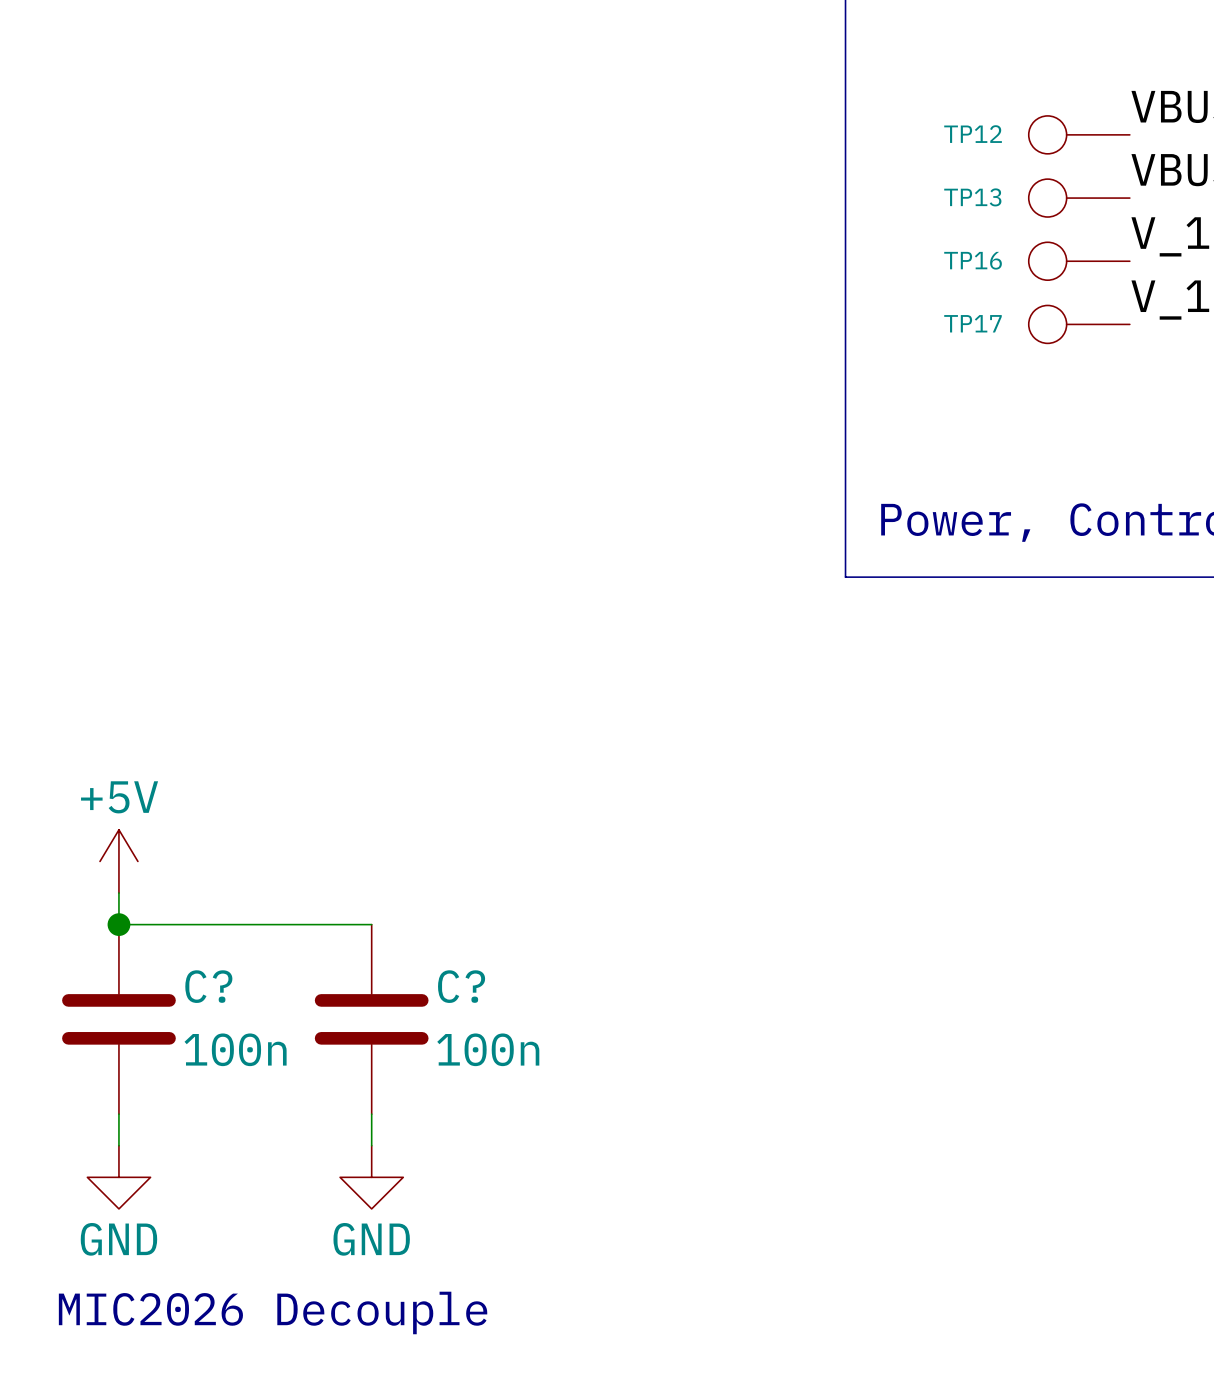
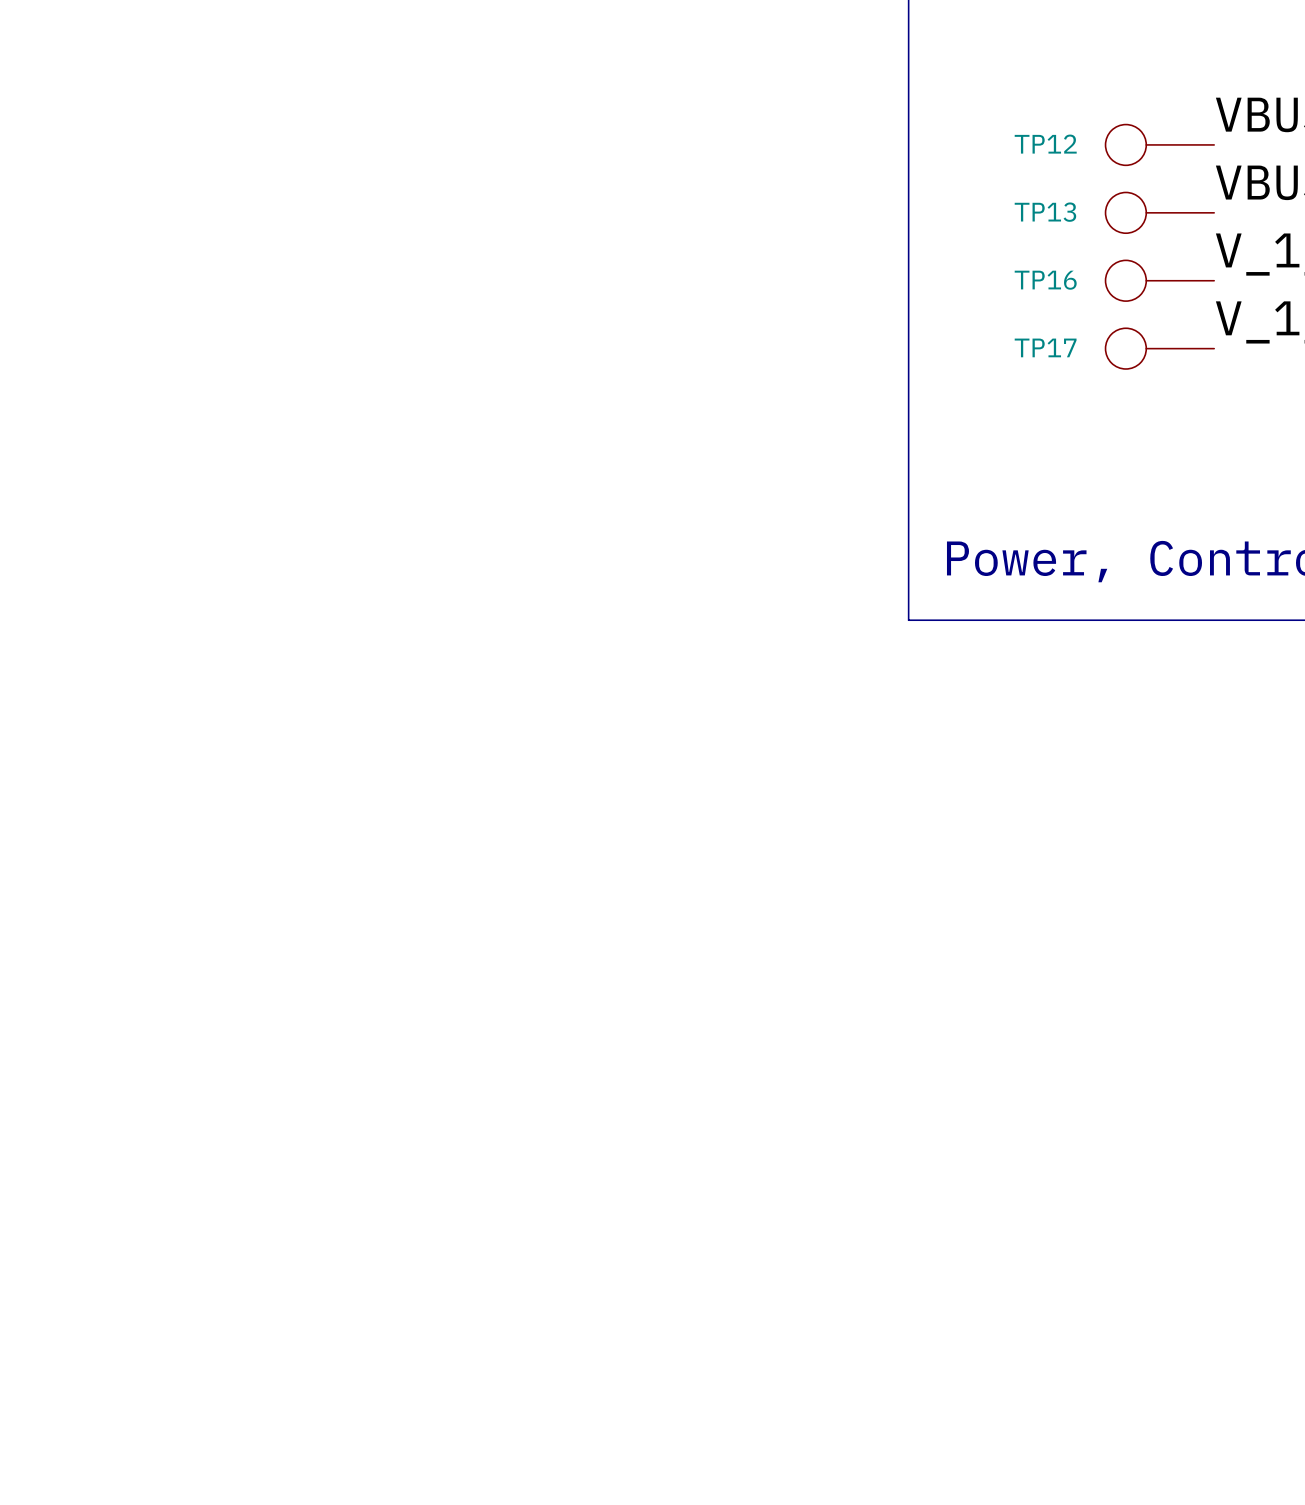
power symbol: +5V (118, 861) -> none
wire: (118, 893) (118, 924) (371, 924) -> none
junction: (118, 924) -> none
C?: 100n (118, 1019) -> none
C?: 100n (371, 1019) -> none
wire: (118, 1114) (118, 1145) -> none
wire: (371, 1114) (371, 1145) -> none
power symbol: GND (118, 1177) -> none
power symbol: GND (371, 1177) -> none
text: MIC2026 Decouple (273, 1312) -> none

